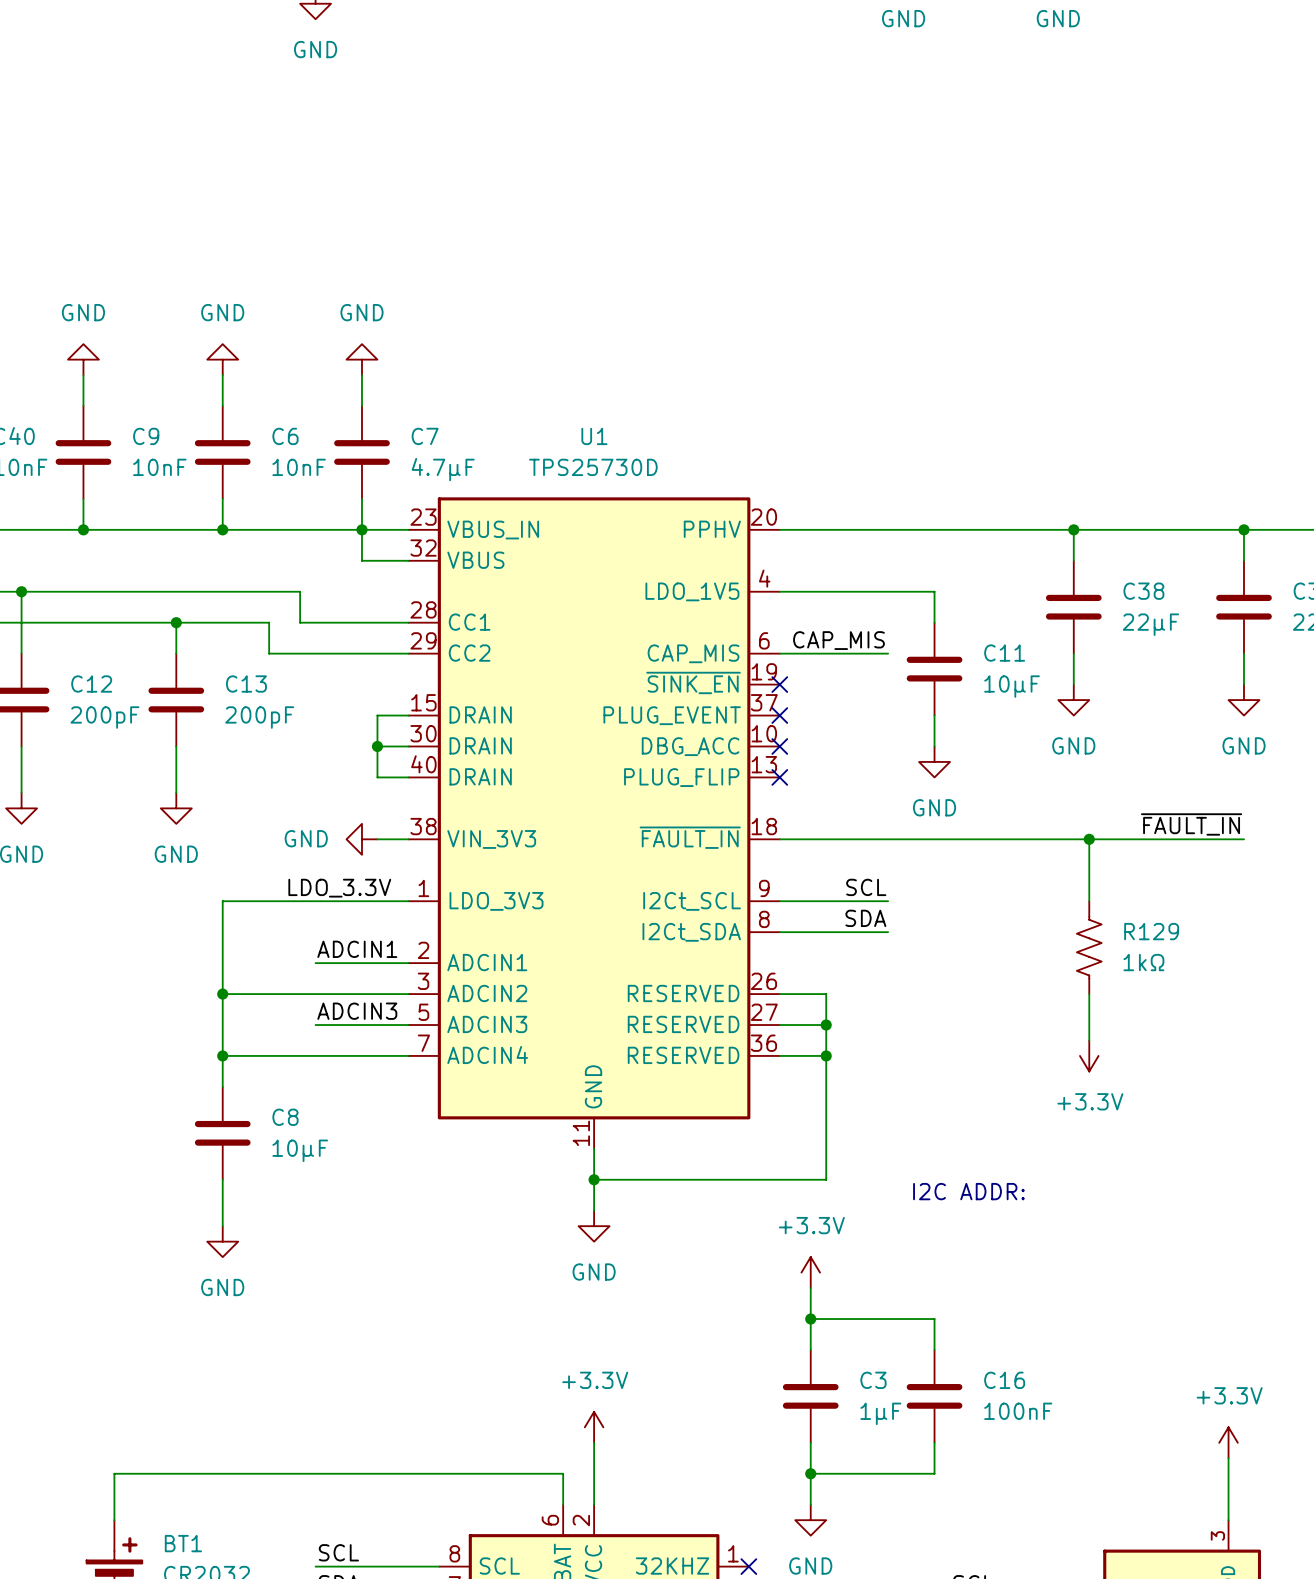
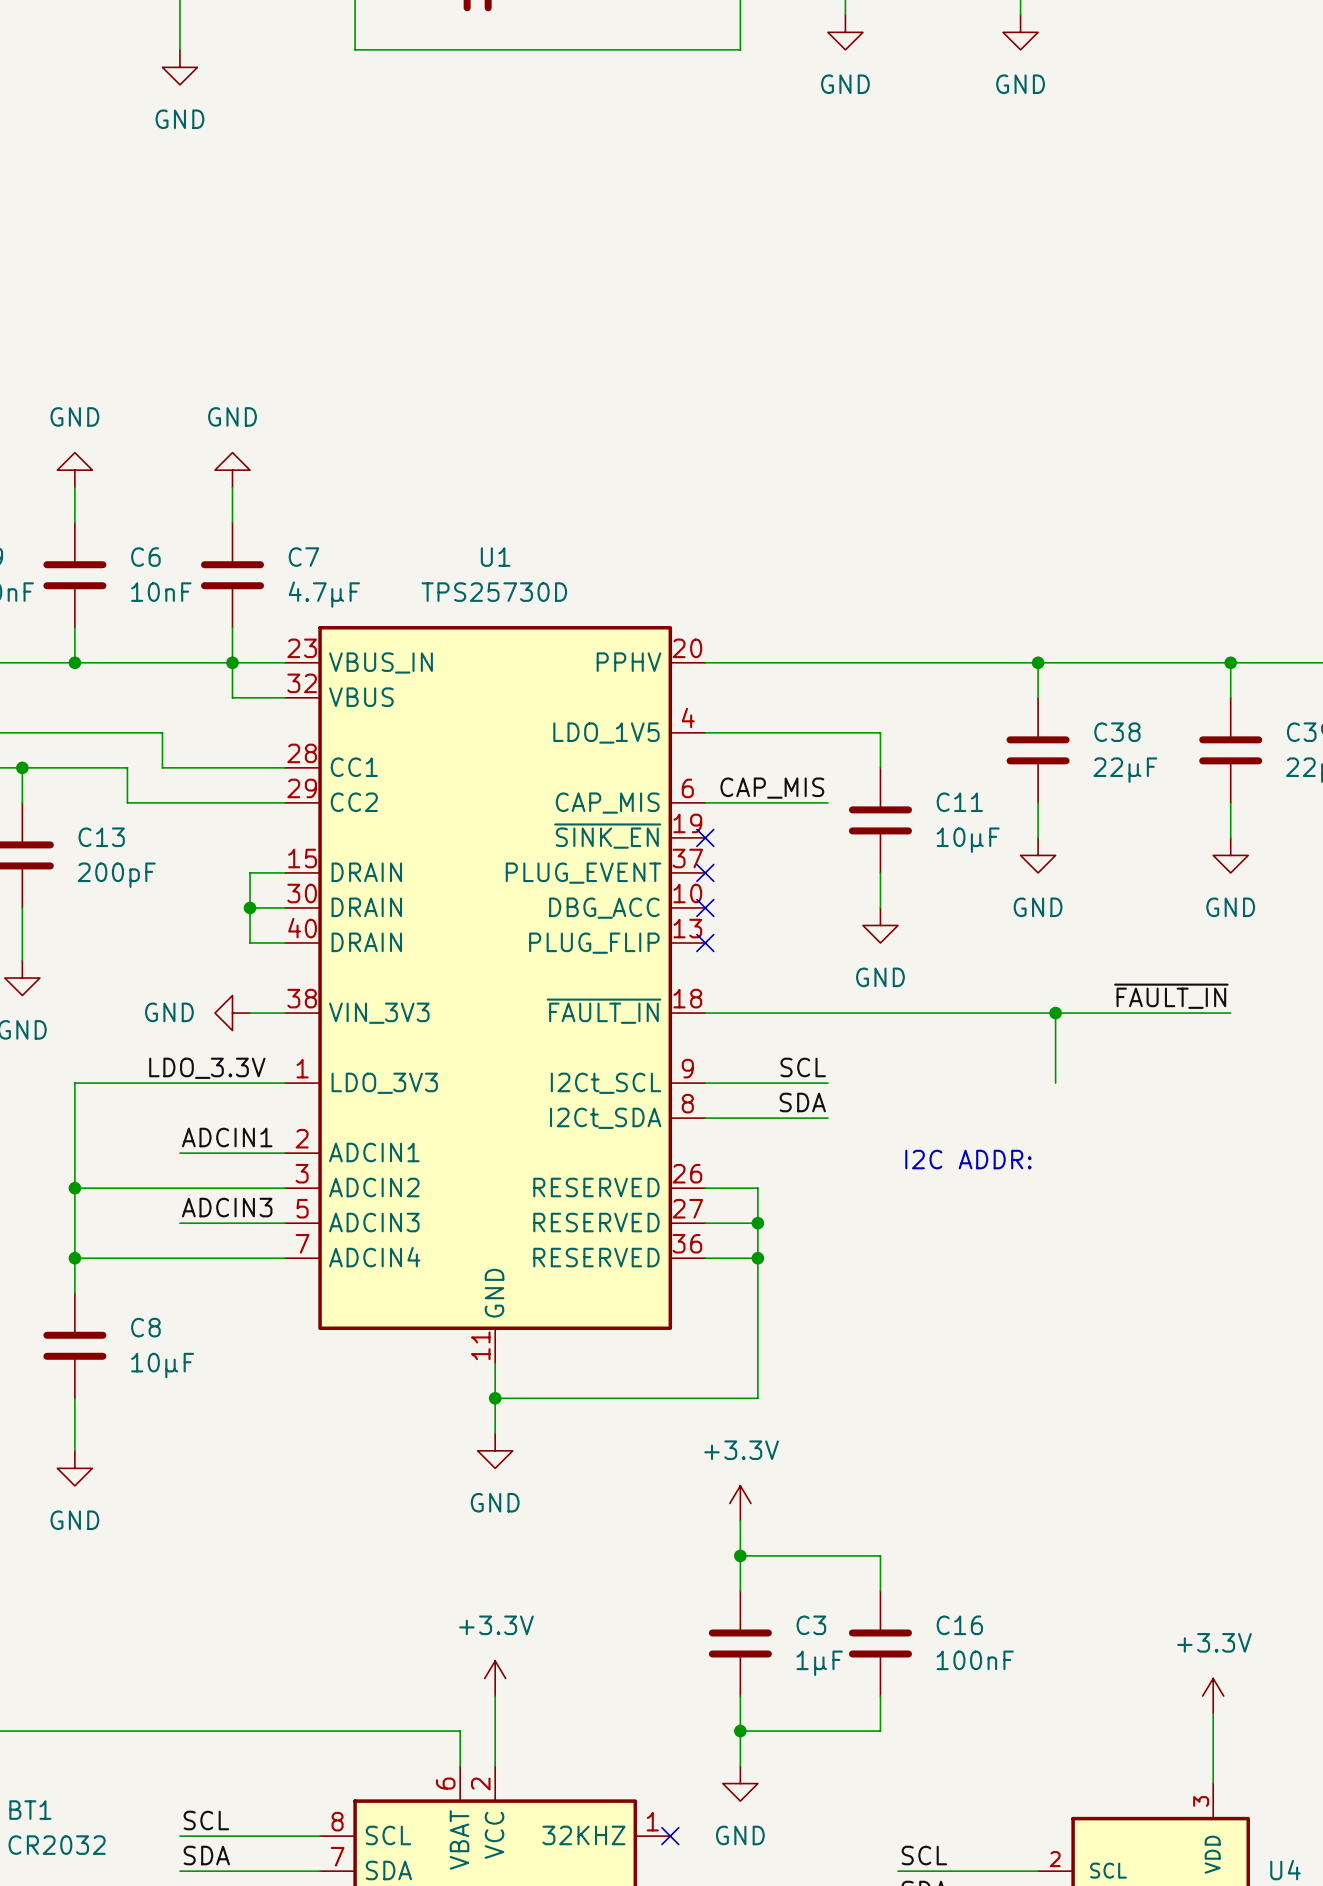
R129: 1kΩ (1089, 947) -> none
wire: (1089, 994) (1089, 1040) -> none
power symbol: +3.3V (1089, 1055) -> none
text position: I2C ADDR: (968, 1191) -> I2C ADDR: (968, 1159)

